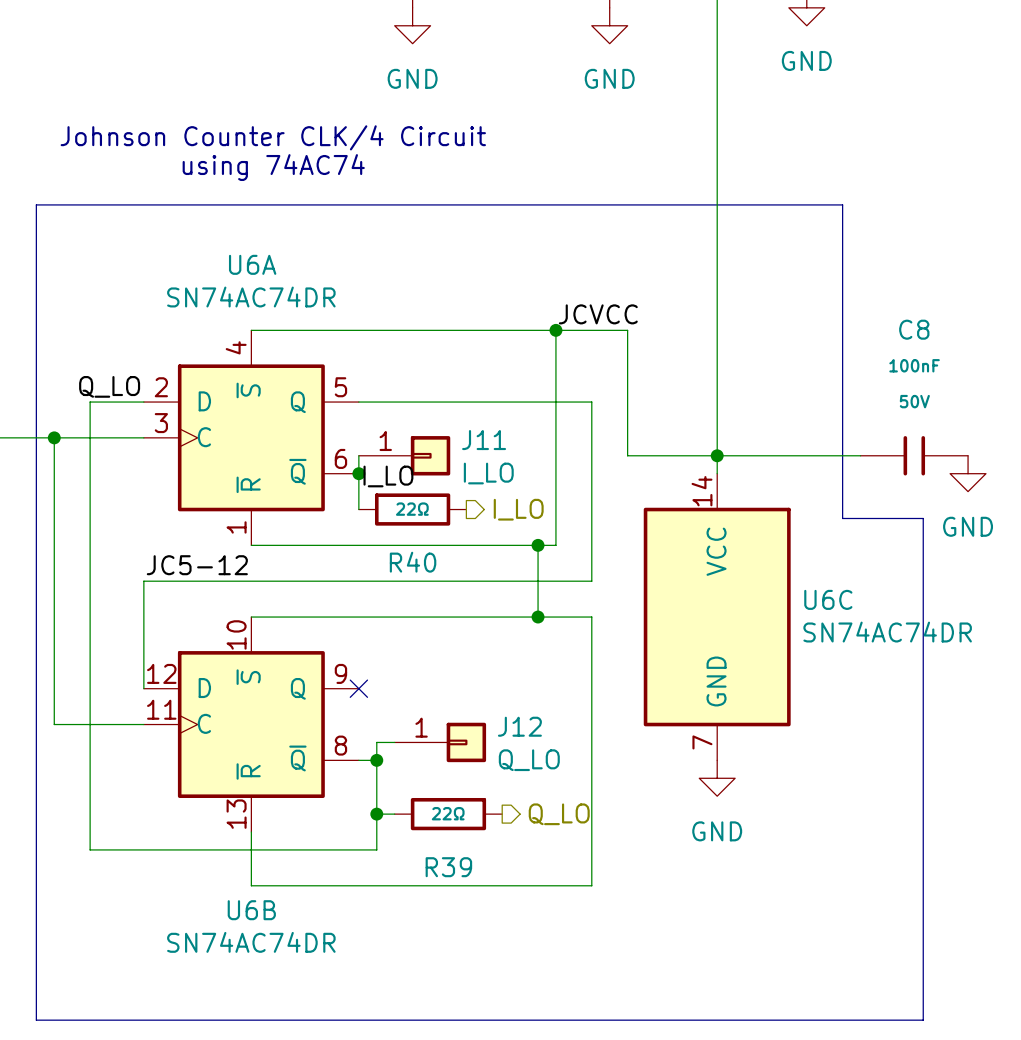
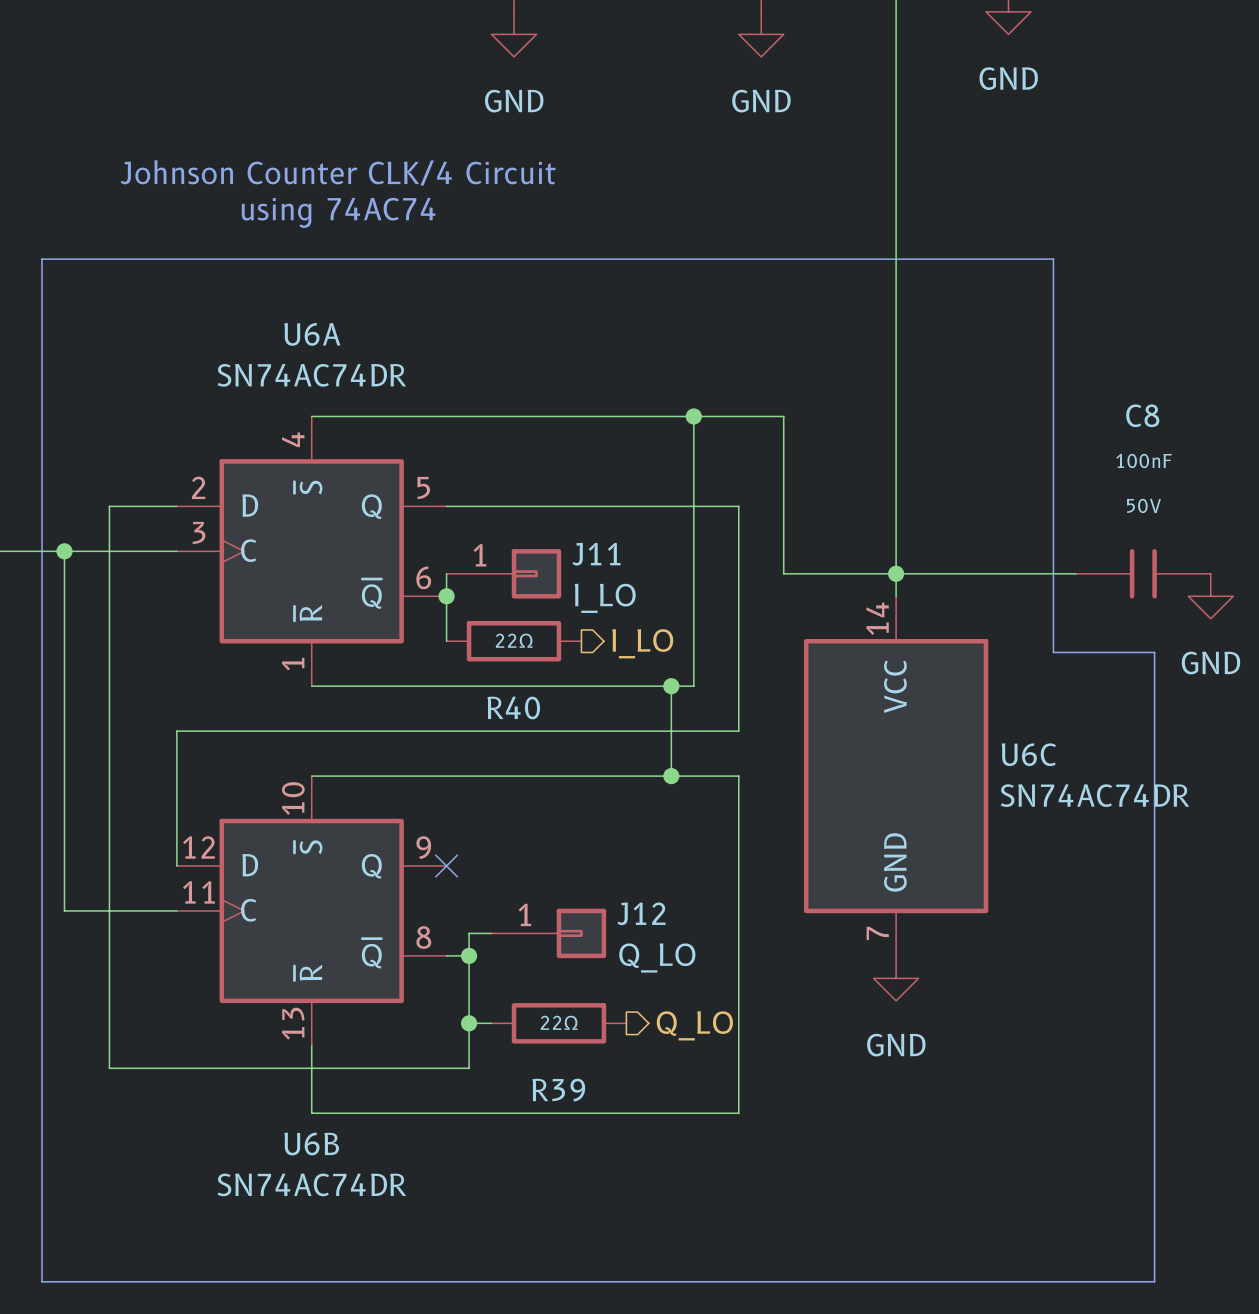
label: JCVCC (598, 314) -> none
label: Q_LO (109, 386) -> none
label: I_LO (388, 476) -> none
label: JC5-12 (197, 565) -> none

